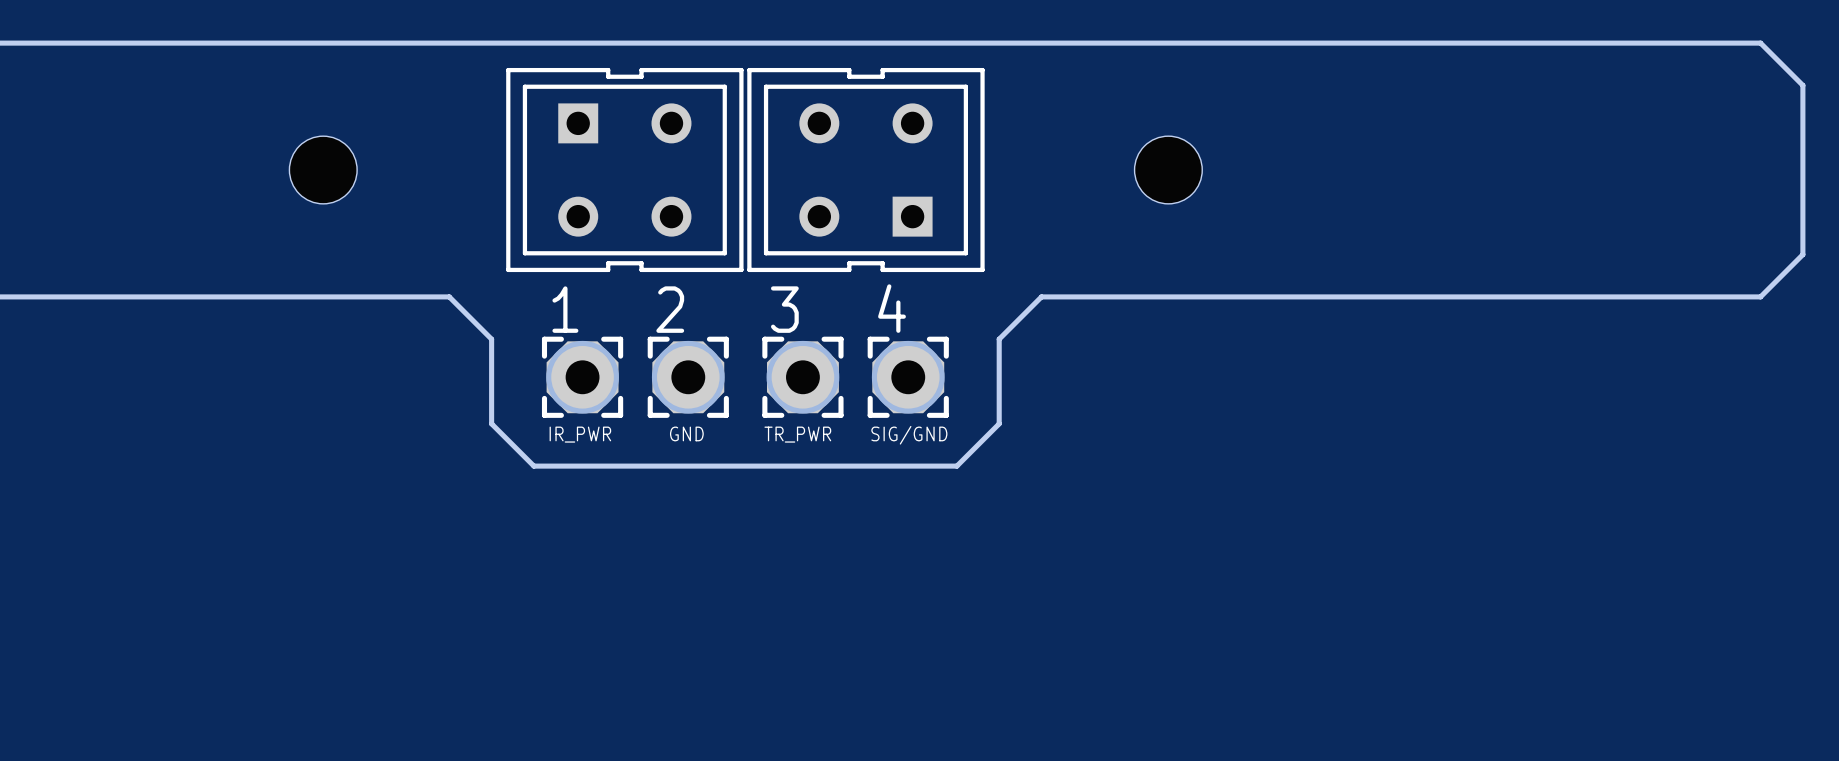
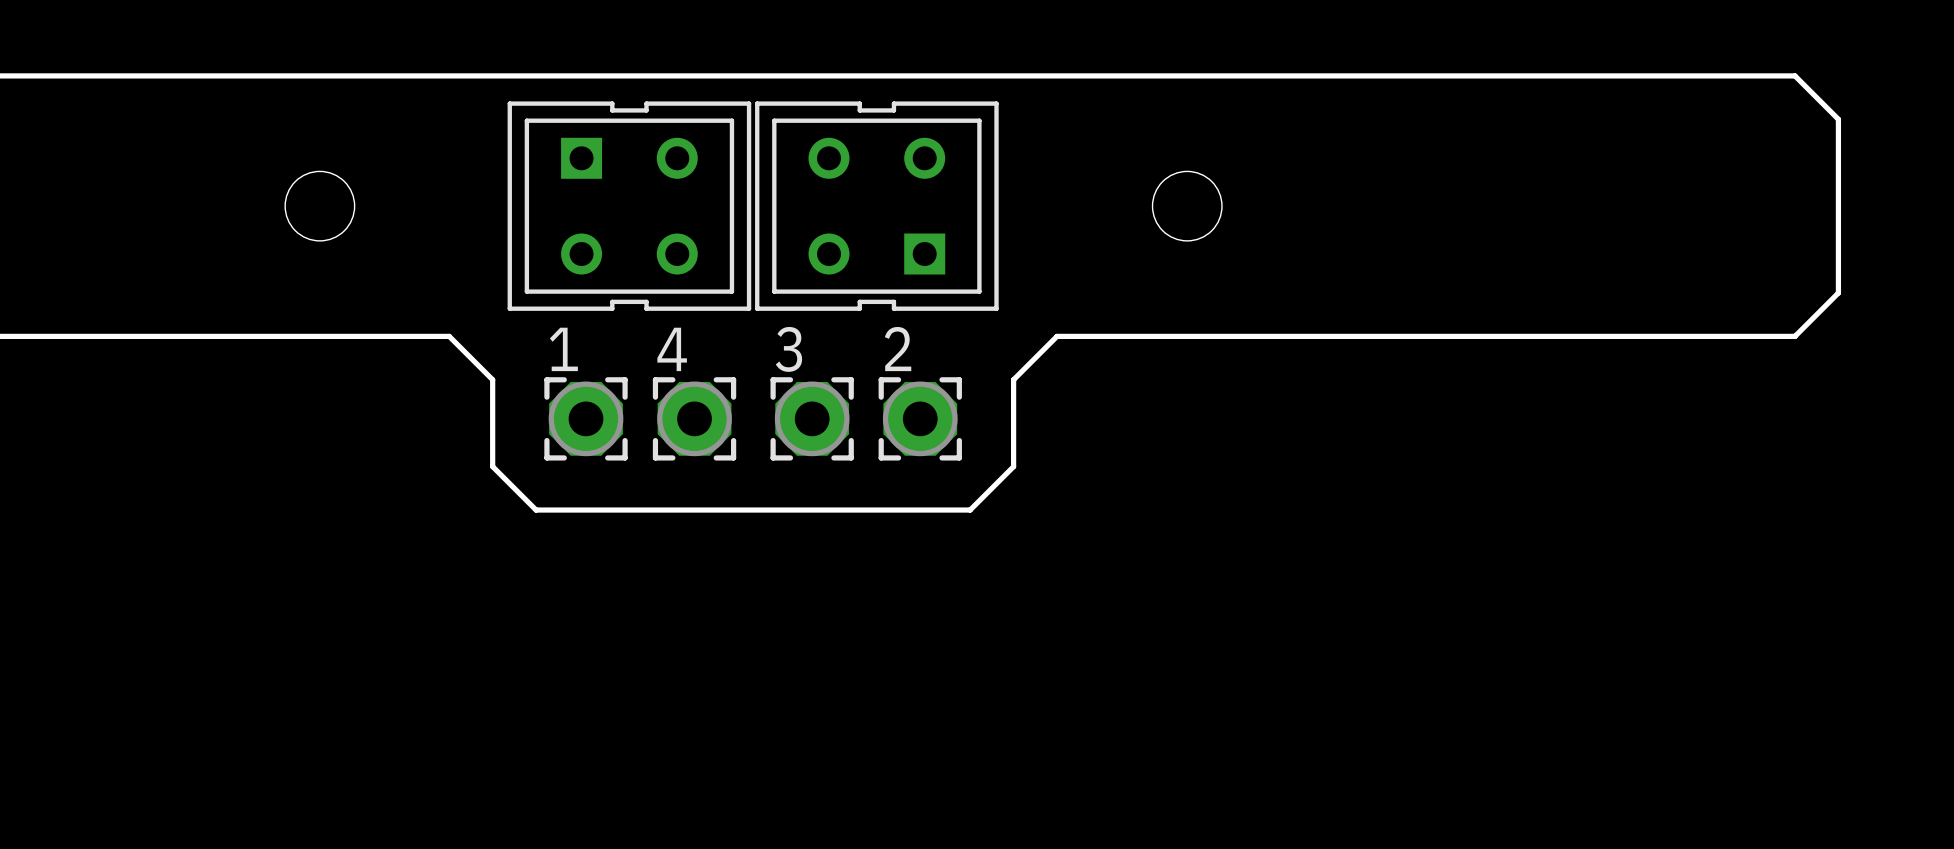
4 name: 4 (892, 308) -> 2 (898, 349)
2 name: 2 (670, 309) -> 4 (672, 349)
text: GND (686, 433) -> none
text: IR_PWR (580, 434) -> none
text: TR_PWR (797, 434) -> none
text: SIG/GND (909, 435) -> none

